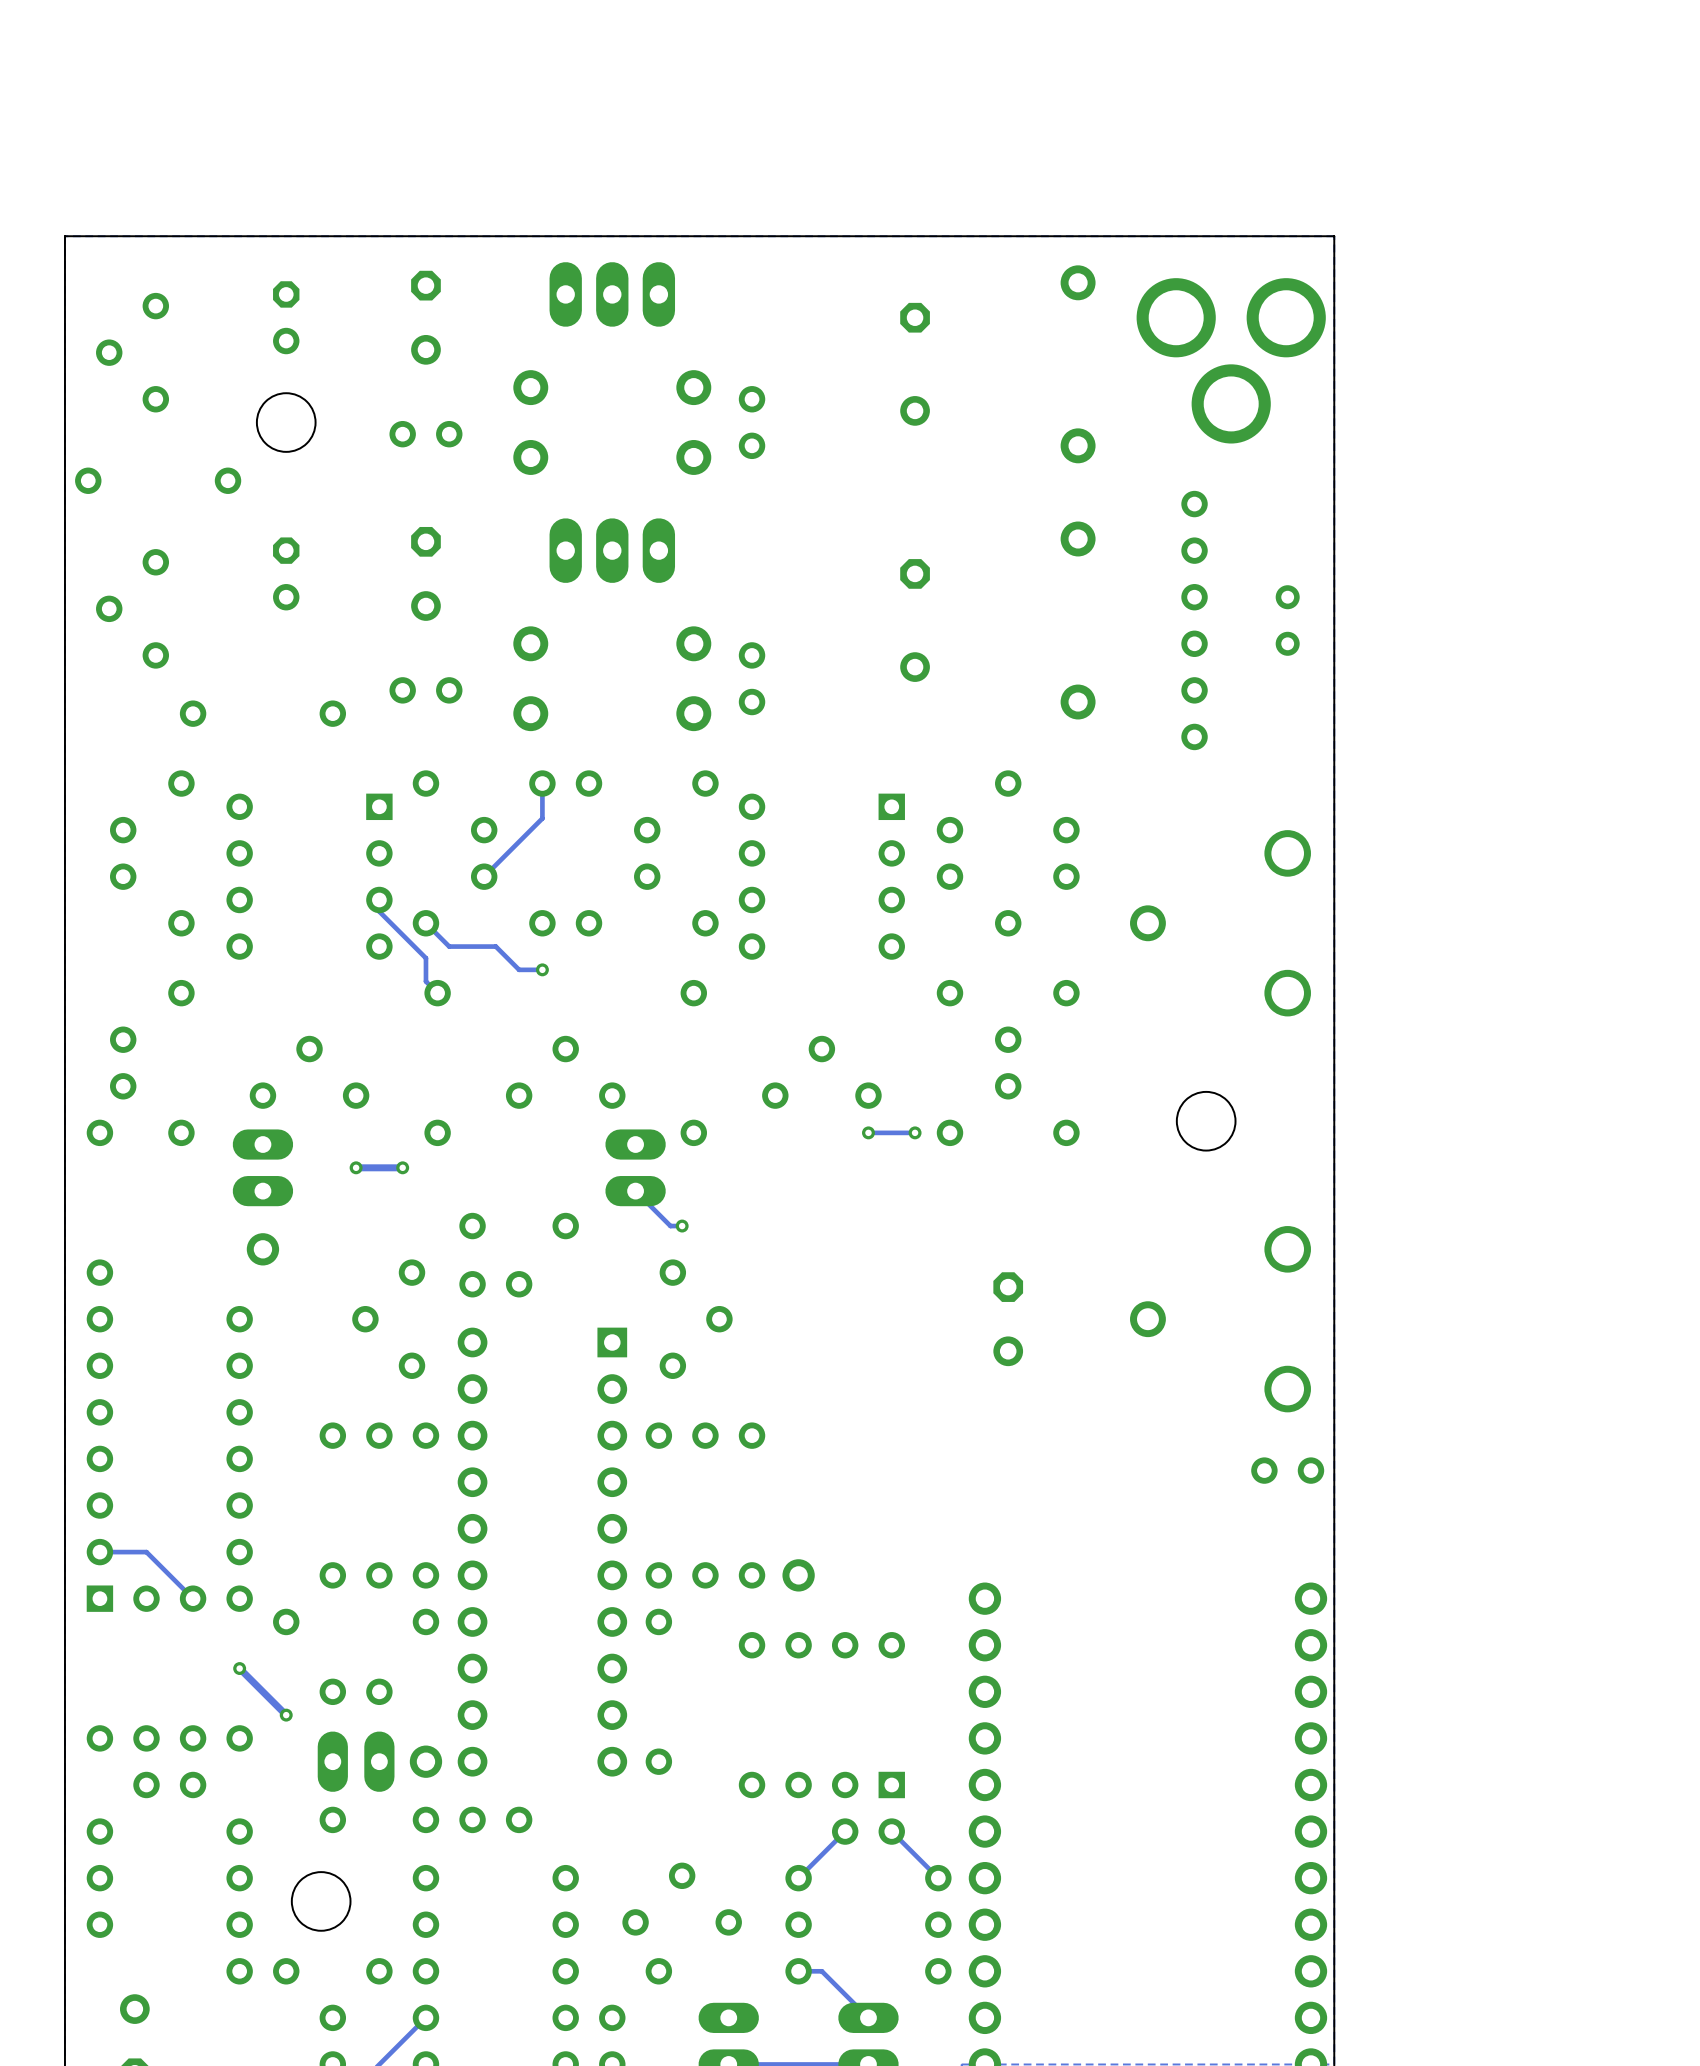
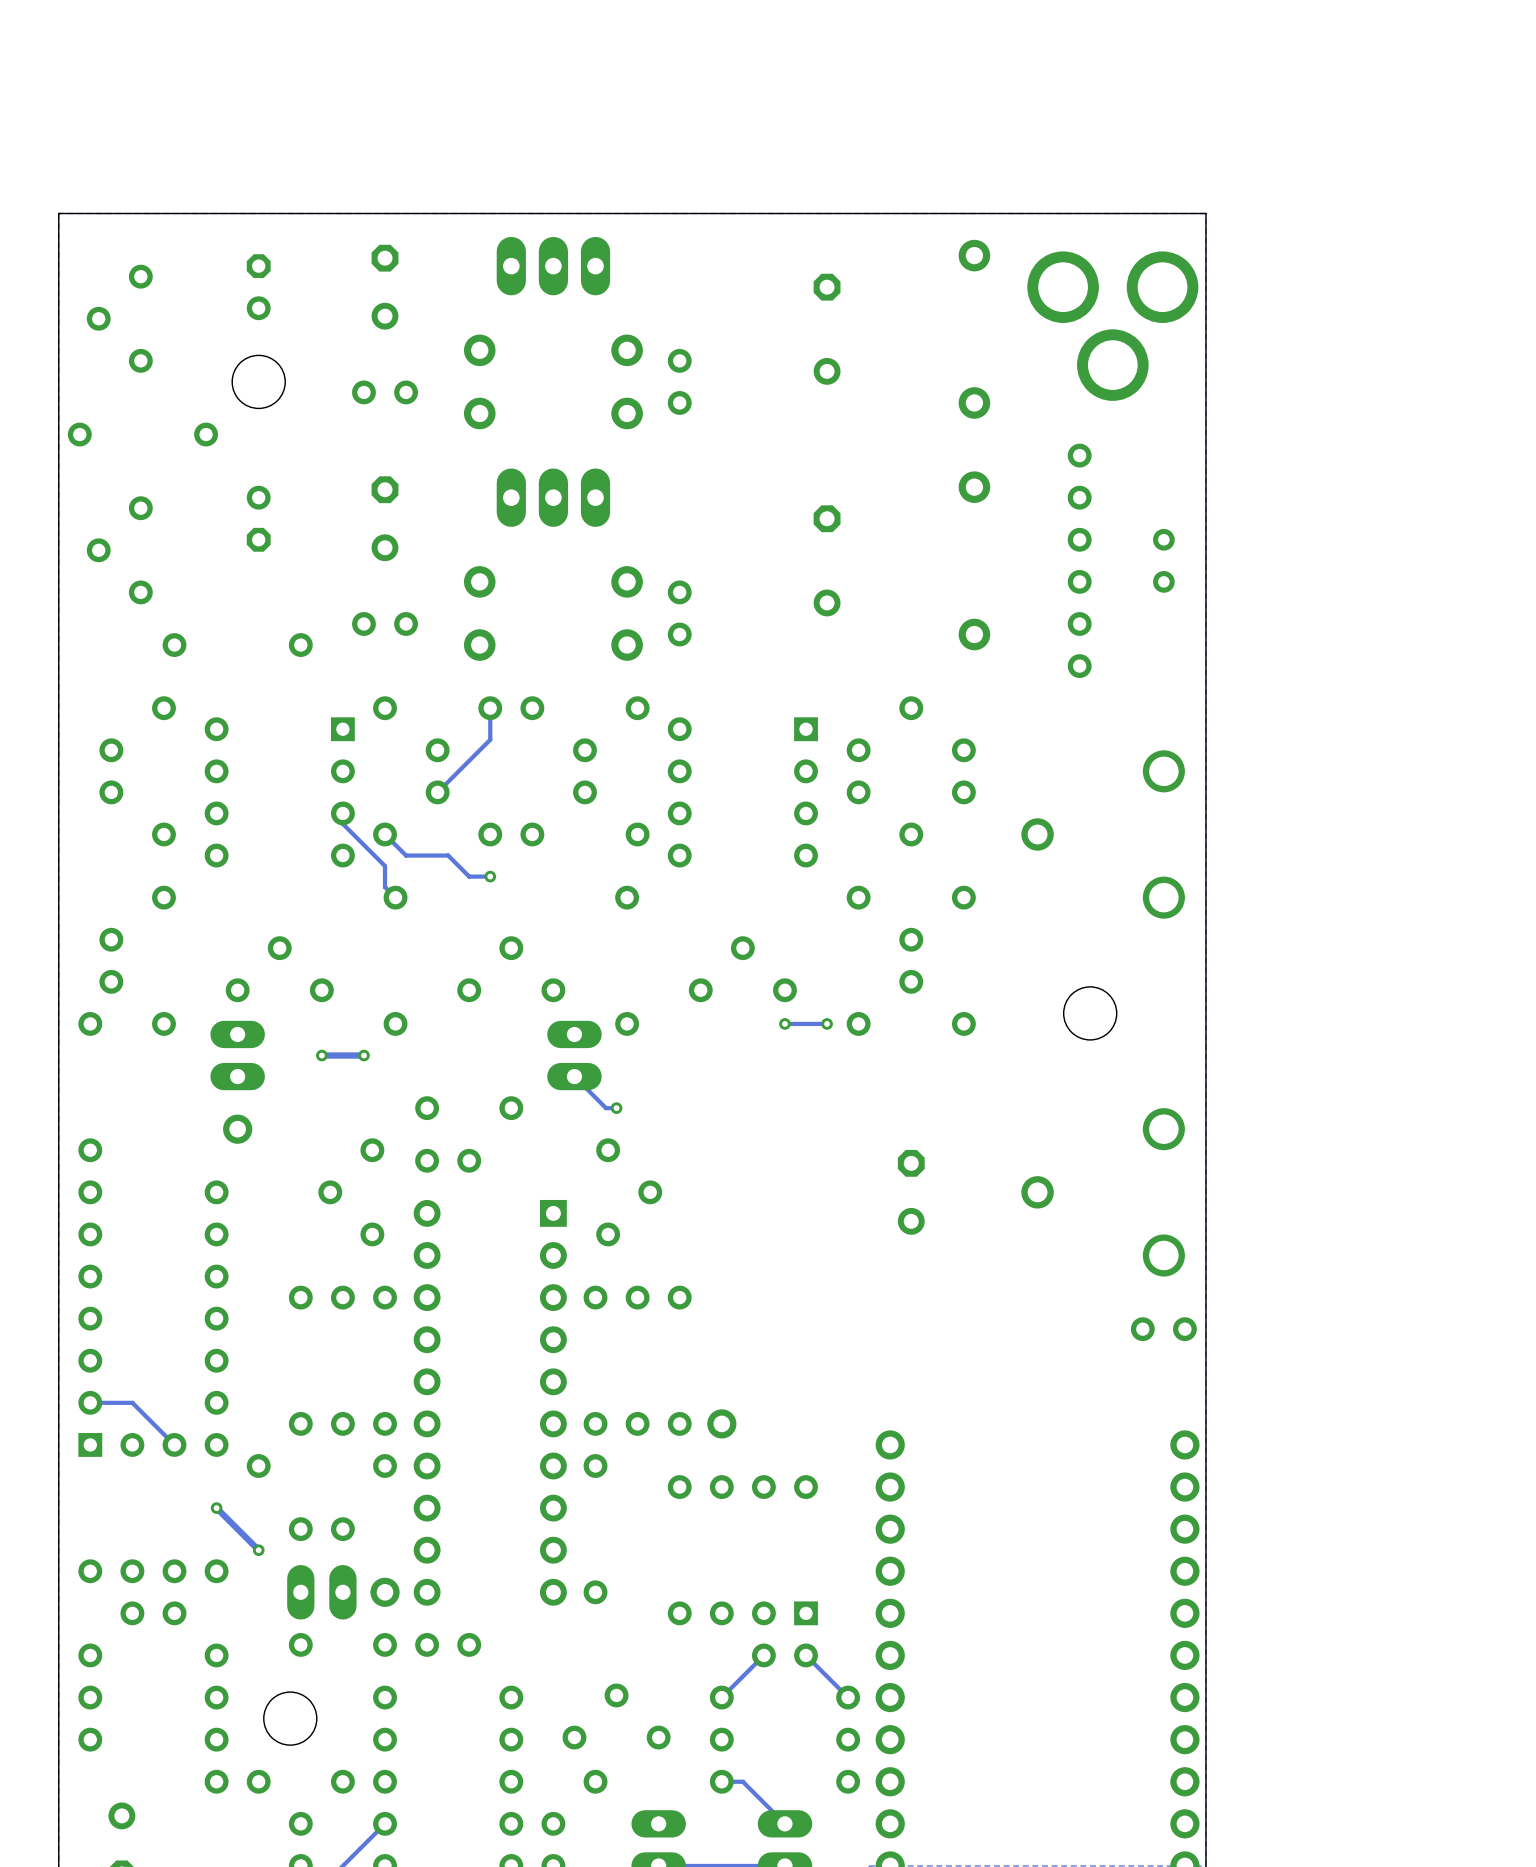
part rotation: 0° (286, 573) -> 180° (258, 518)

